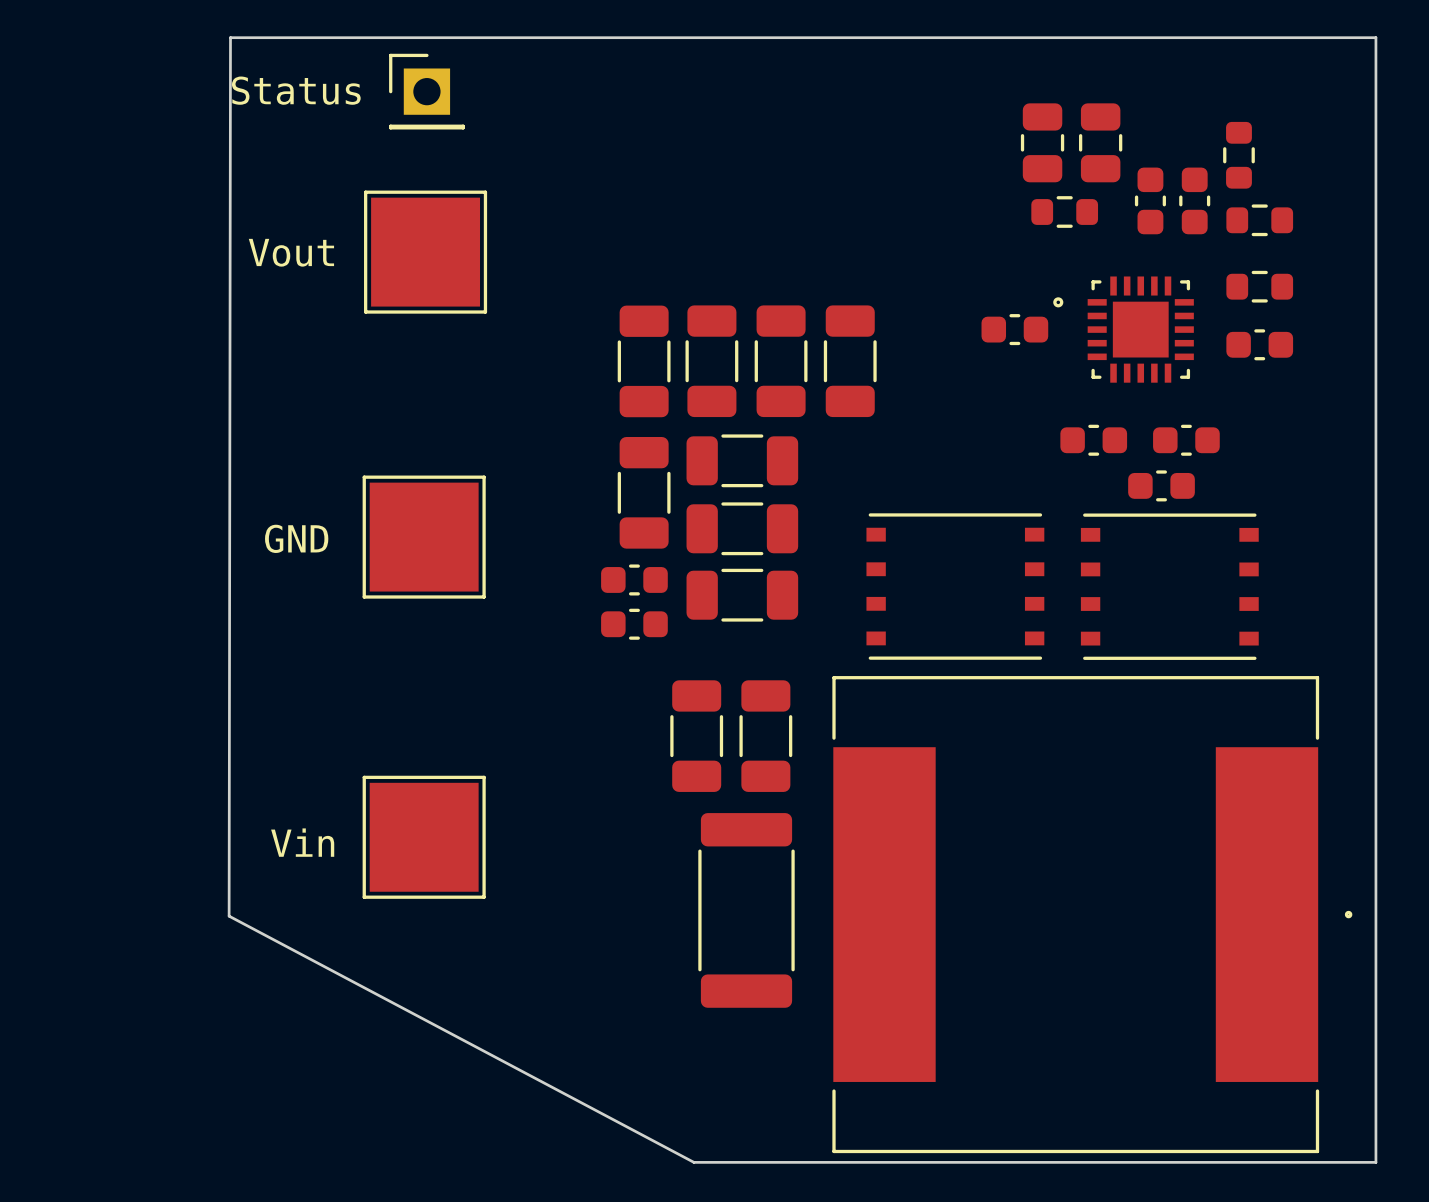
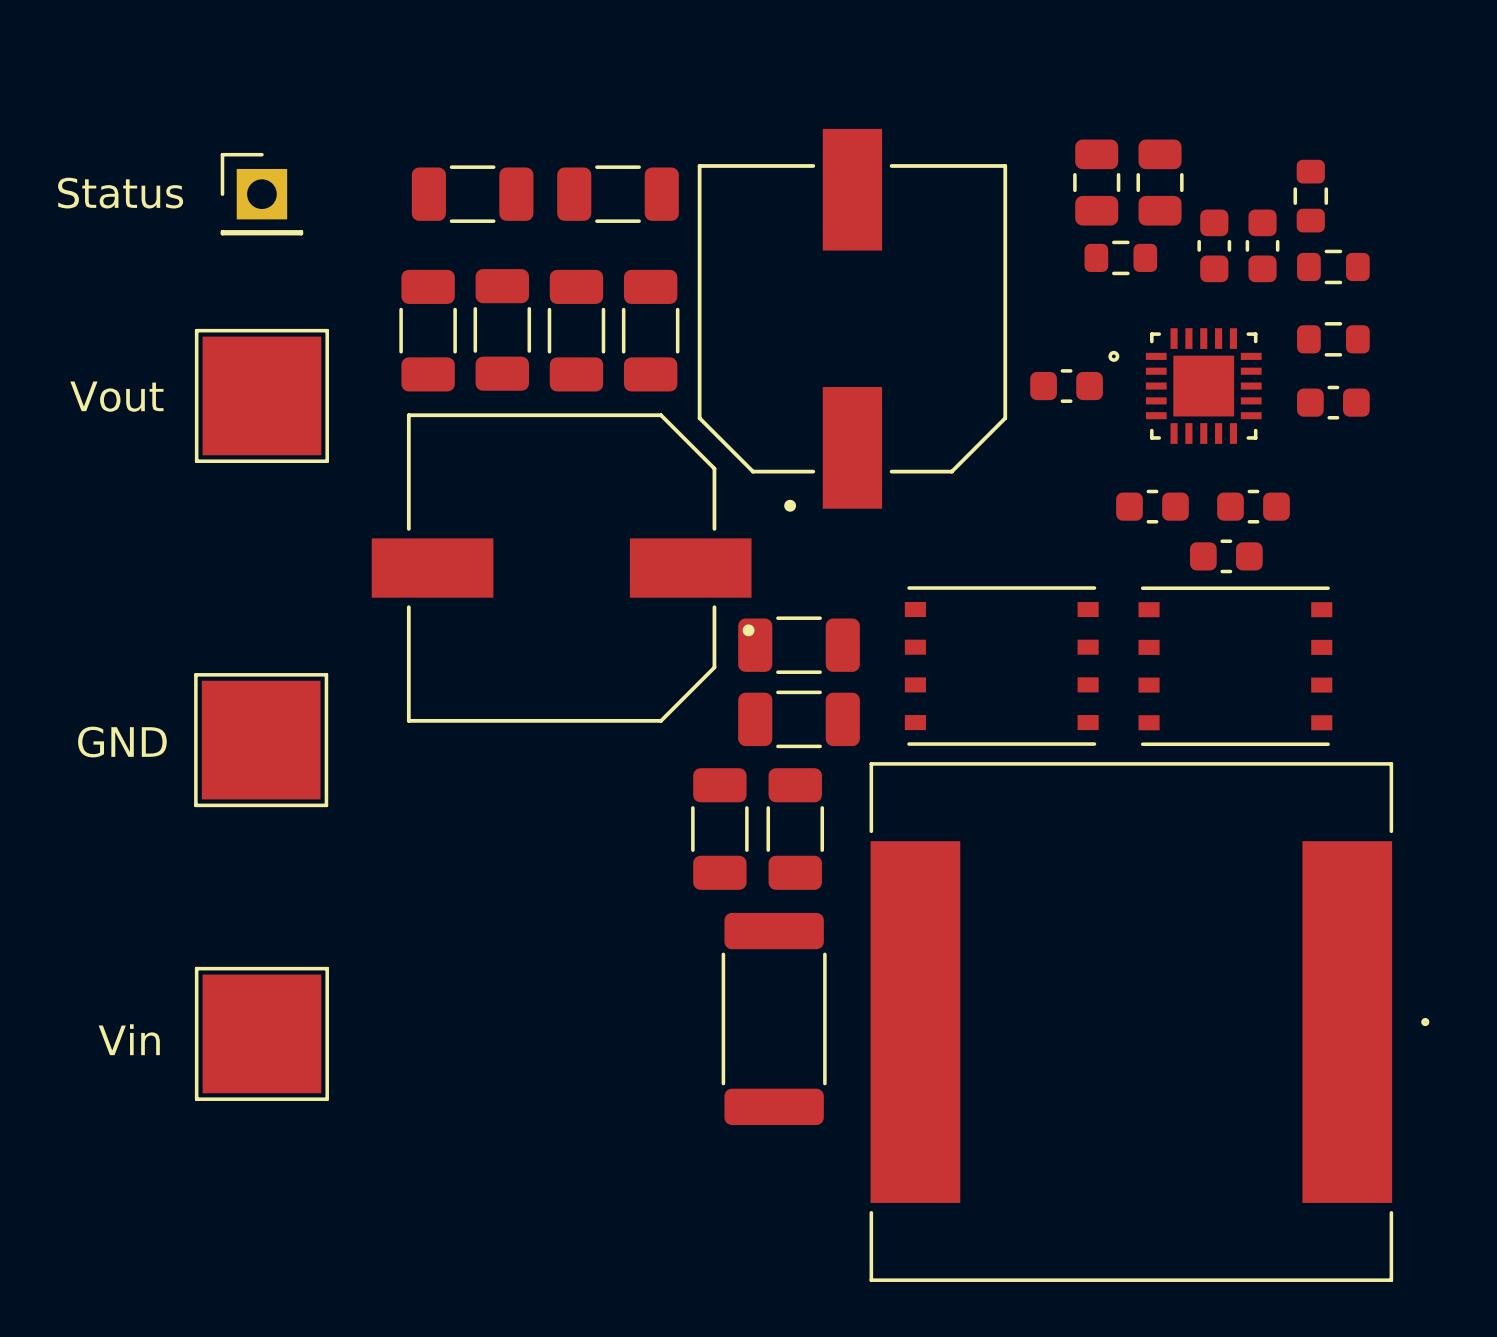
board edge: (230, 37) (229, 916) (693, 1162) (1375, 1162) (1375, 37) (230, 37) -> none
Status position: (426, 91) -> (261, 194)
part: none -> (472, 194)
part: none -> (618, 194)
part footprint: [364, 190, 488, 314] -> [399, 269, 457, 392]
text position: Vout (291, 252) -> Vout (116, 396)
part: none -> (852, 320)
part: none -> (502, 329)
part: none -> (576, 330)
part: none -> (650, 330)
part: none -> (261, 395)
part: (644, 361) -> none
part: (711, 361) -> none
part: (781, 361) -> none
part: (850, 361) -> none
part: (742, 460) -> none
part: (644, 492) -> none
part: none -> (563, 568)
part: (742, 528) -> none
part: (424, 537) -> none
text position: GND (296, 538) -> GND (122, 742)
part: none -> (799, 645)
part: (634, 579) -> none
part: (742, 595) -> none
part: (634, 624) -> none
part: none -> (799, 719)
part: none -> (261, 740)
part footprint: [832, 676, 1353, 1154] -> [869, 762, 1430, 1282]
part: (424, 837) -> none
text position: Vin (302, 842) -> Vin (129, 1039)
part: none -> (261, 1033)

